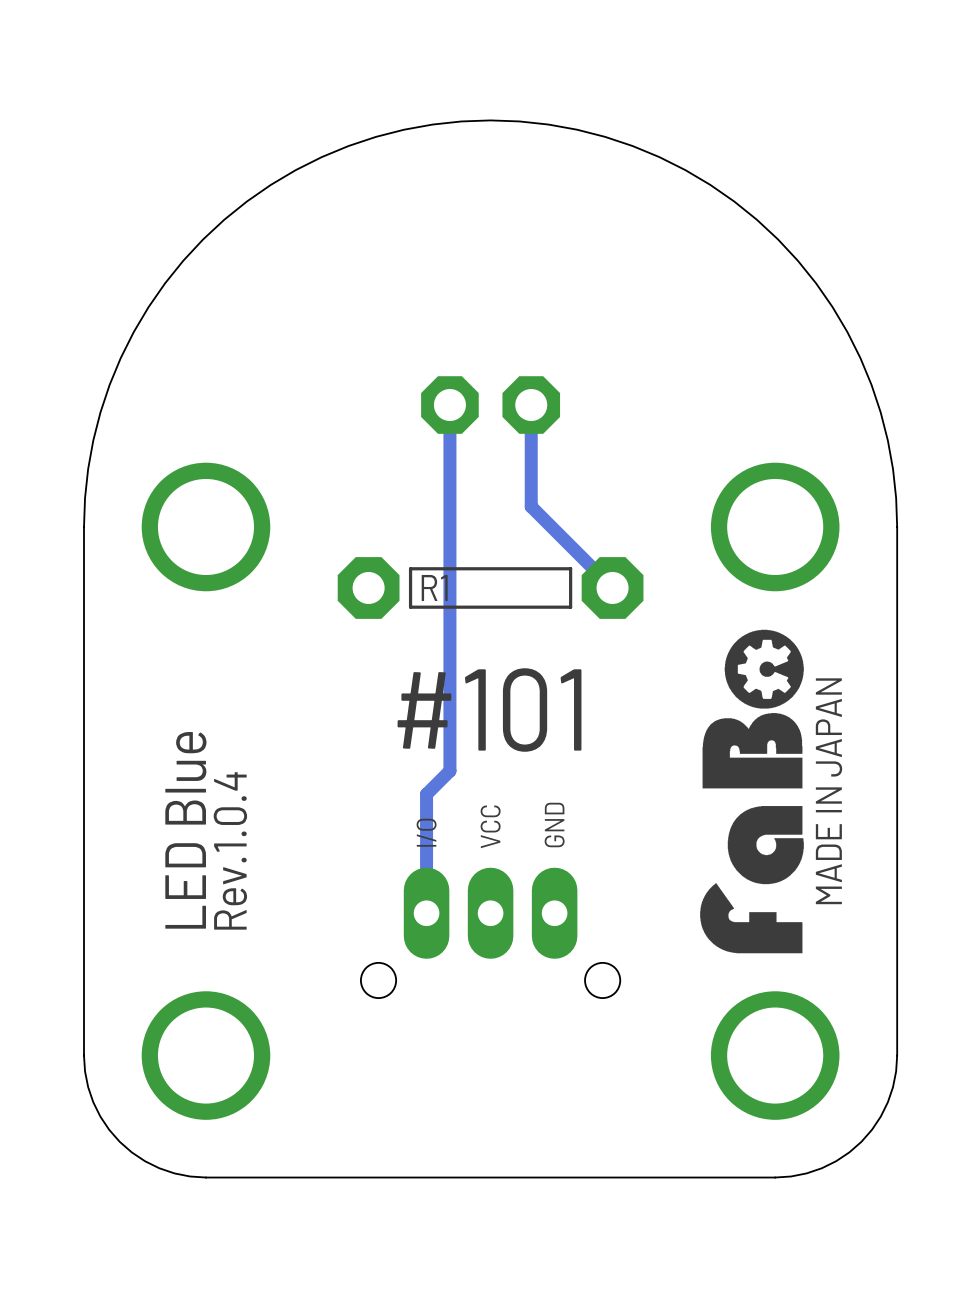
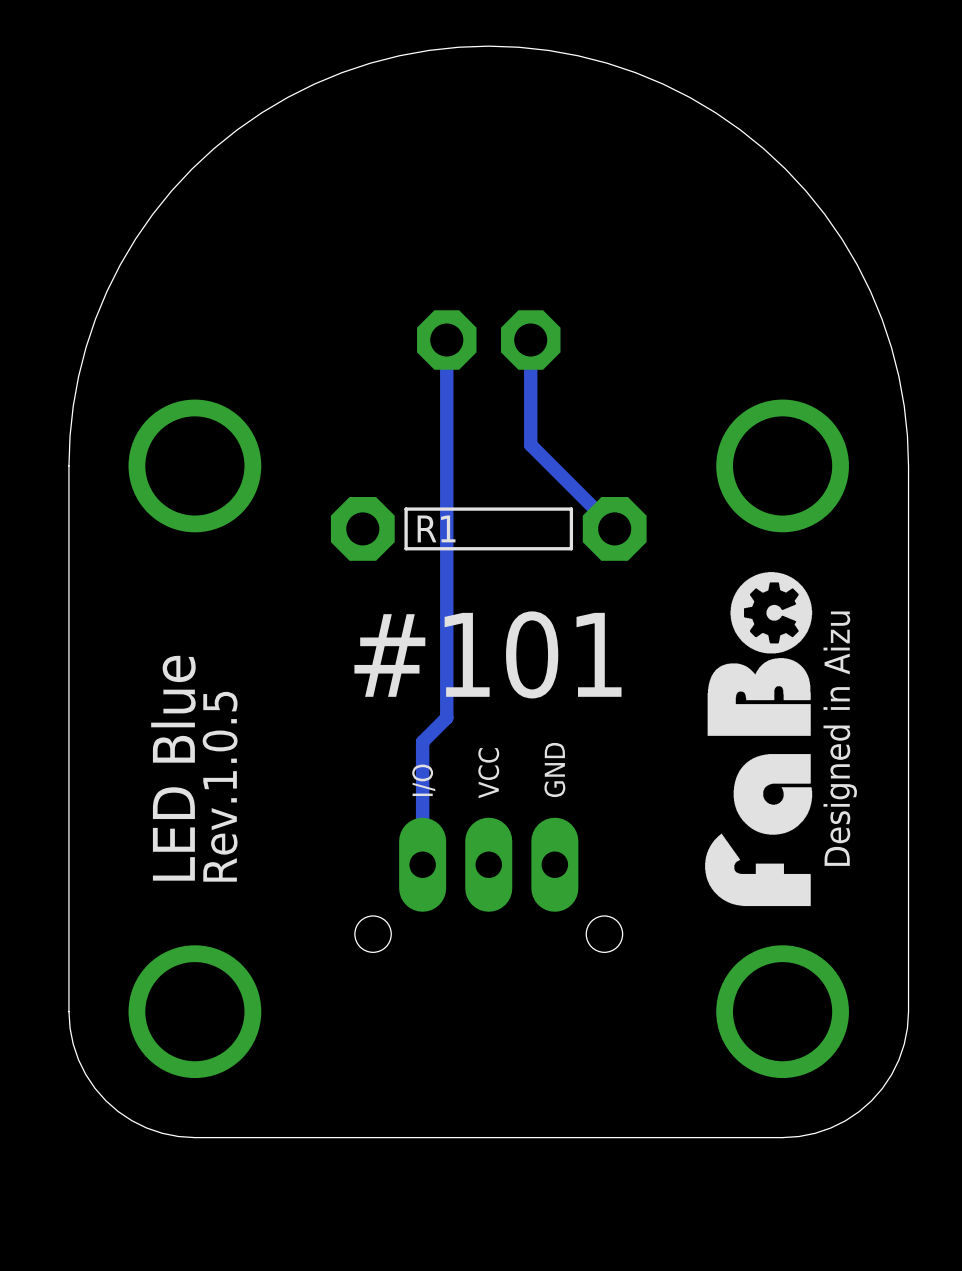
text: MADE IN JAPAN (829, 791) -> Designed in Aizu (840, 738)
text: Rev.1.0.4 (230, 850) -> Rev.1.0.5 (220, 786)

